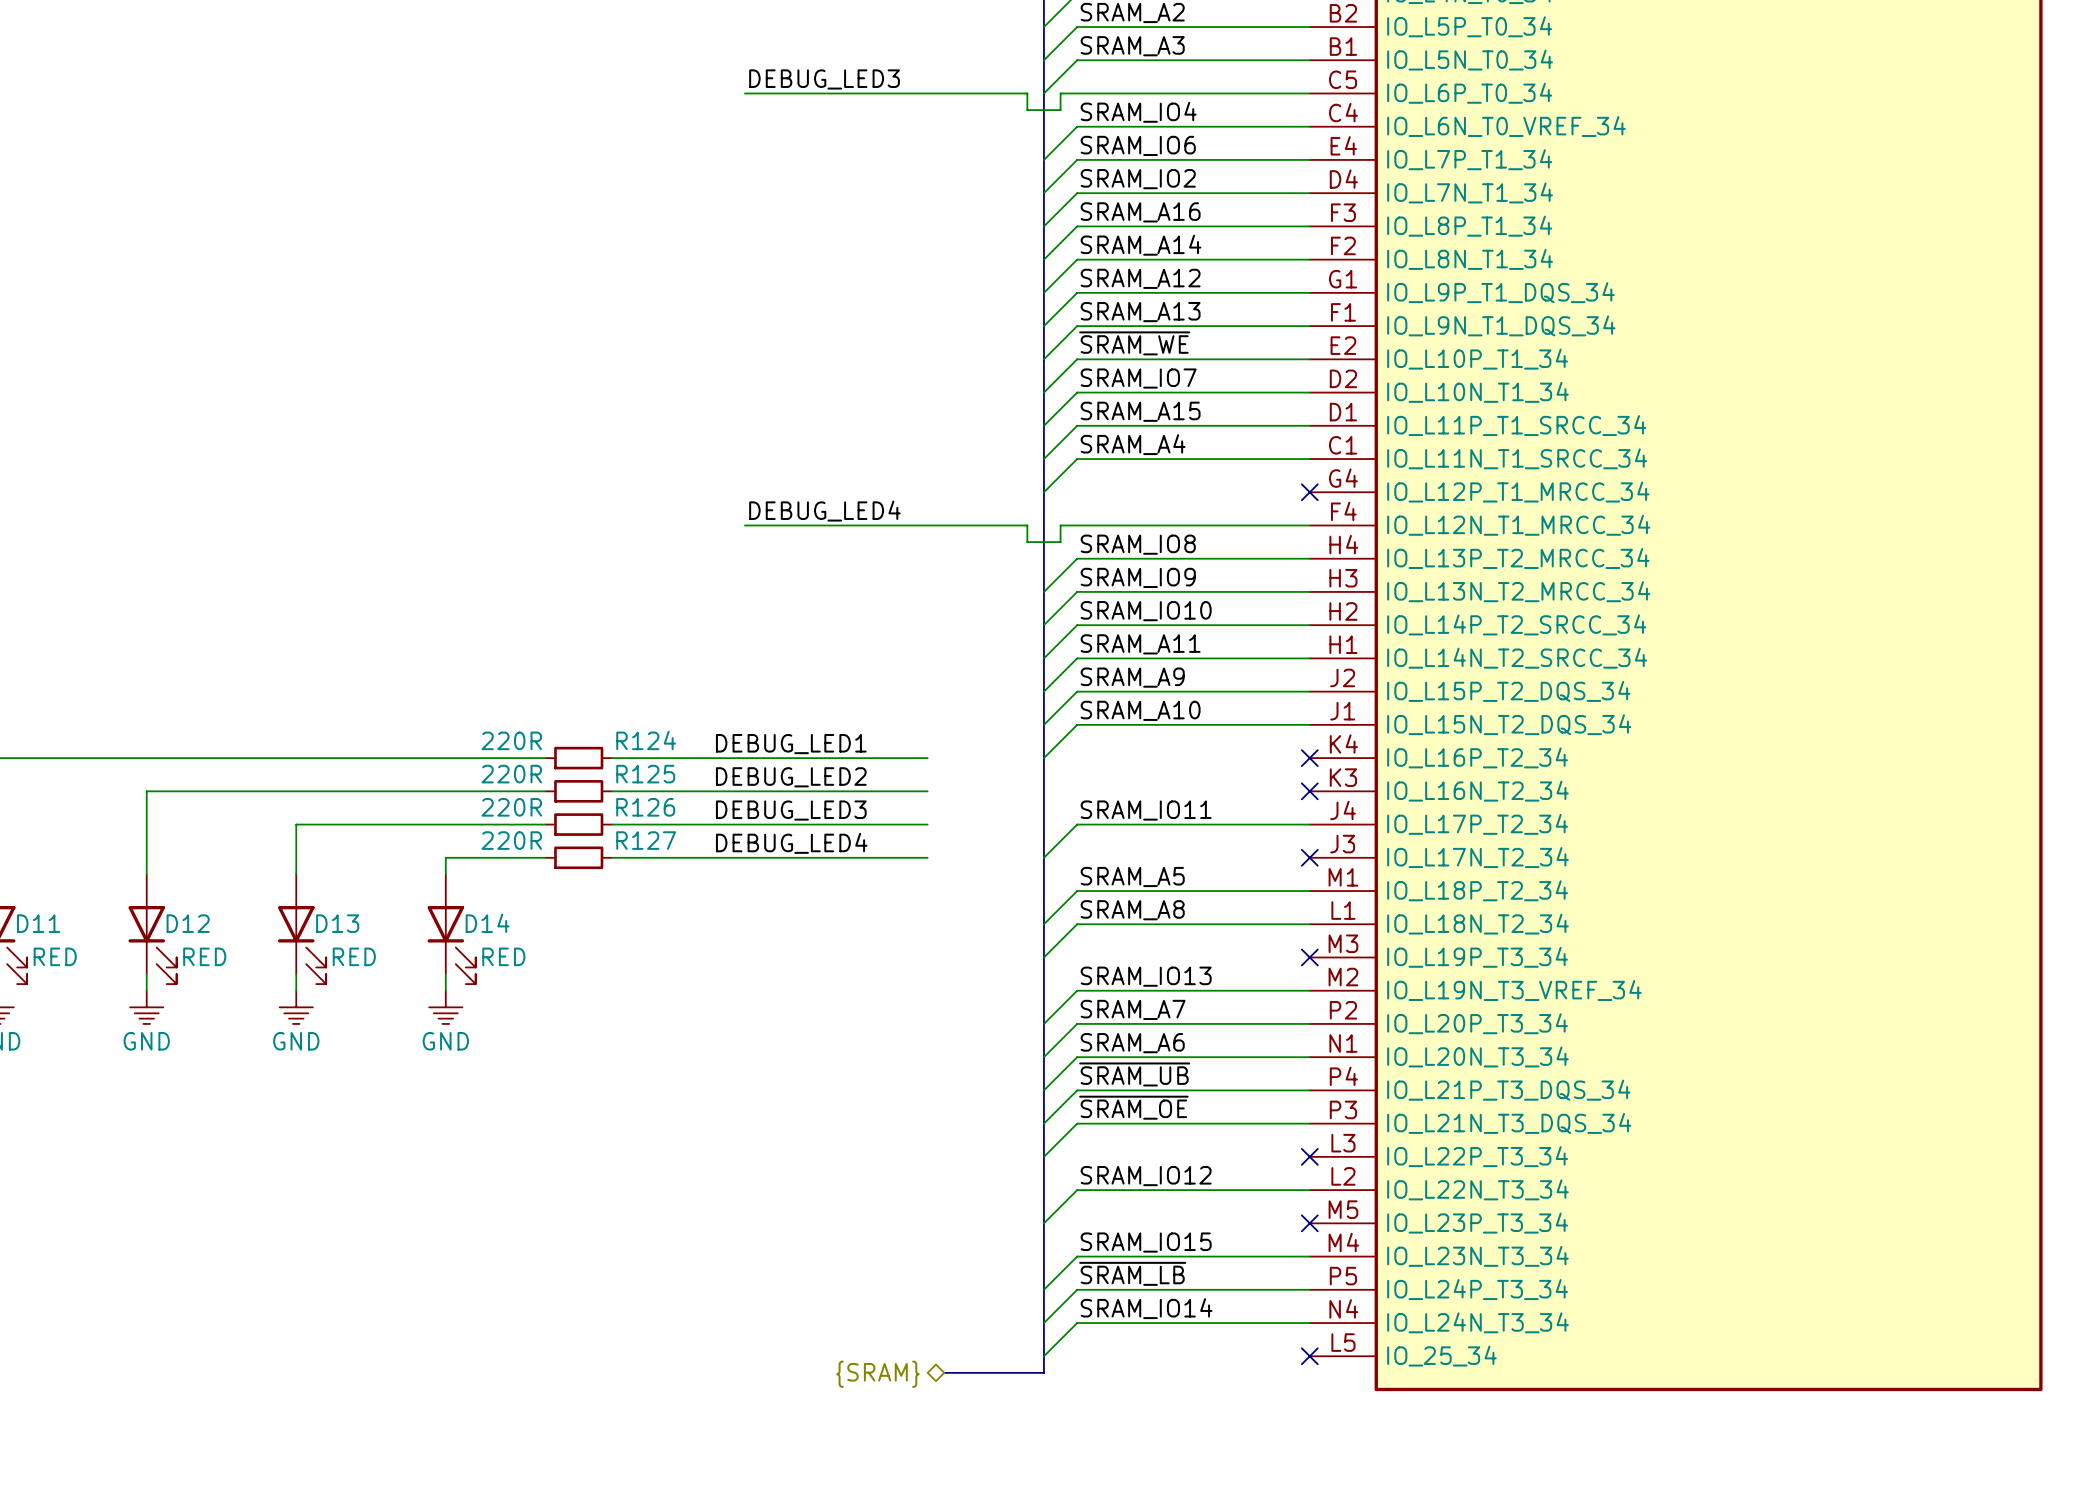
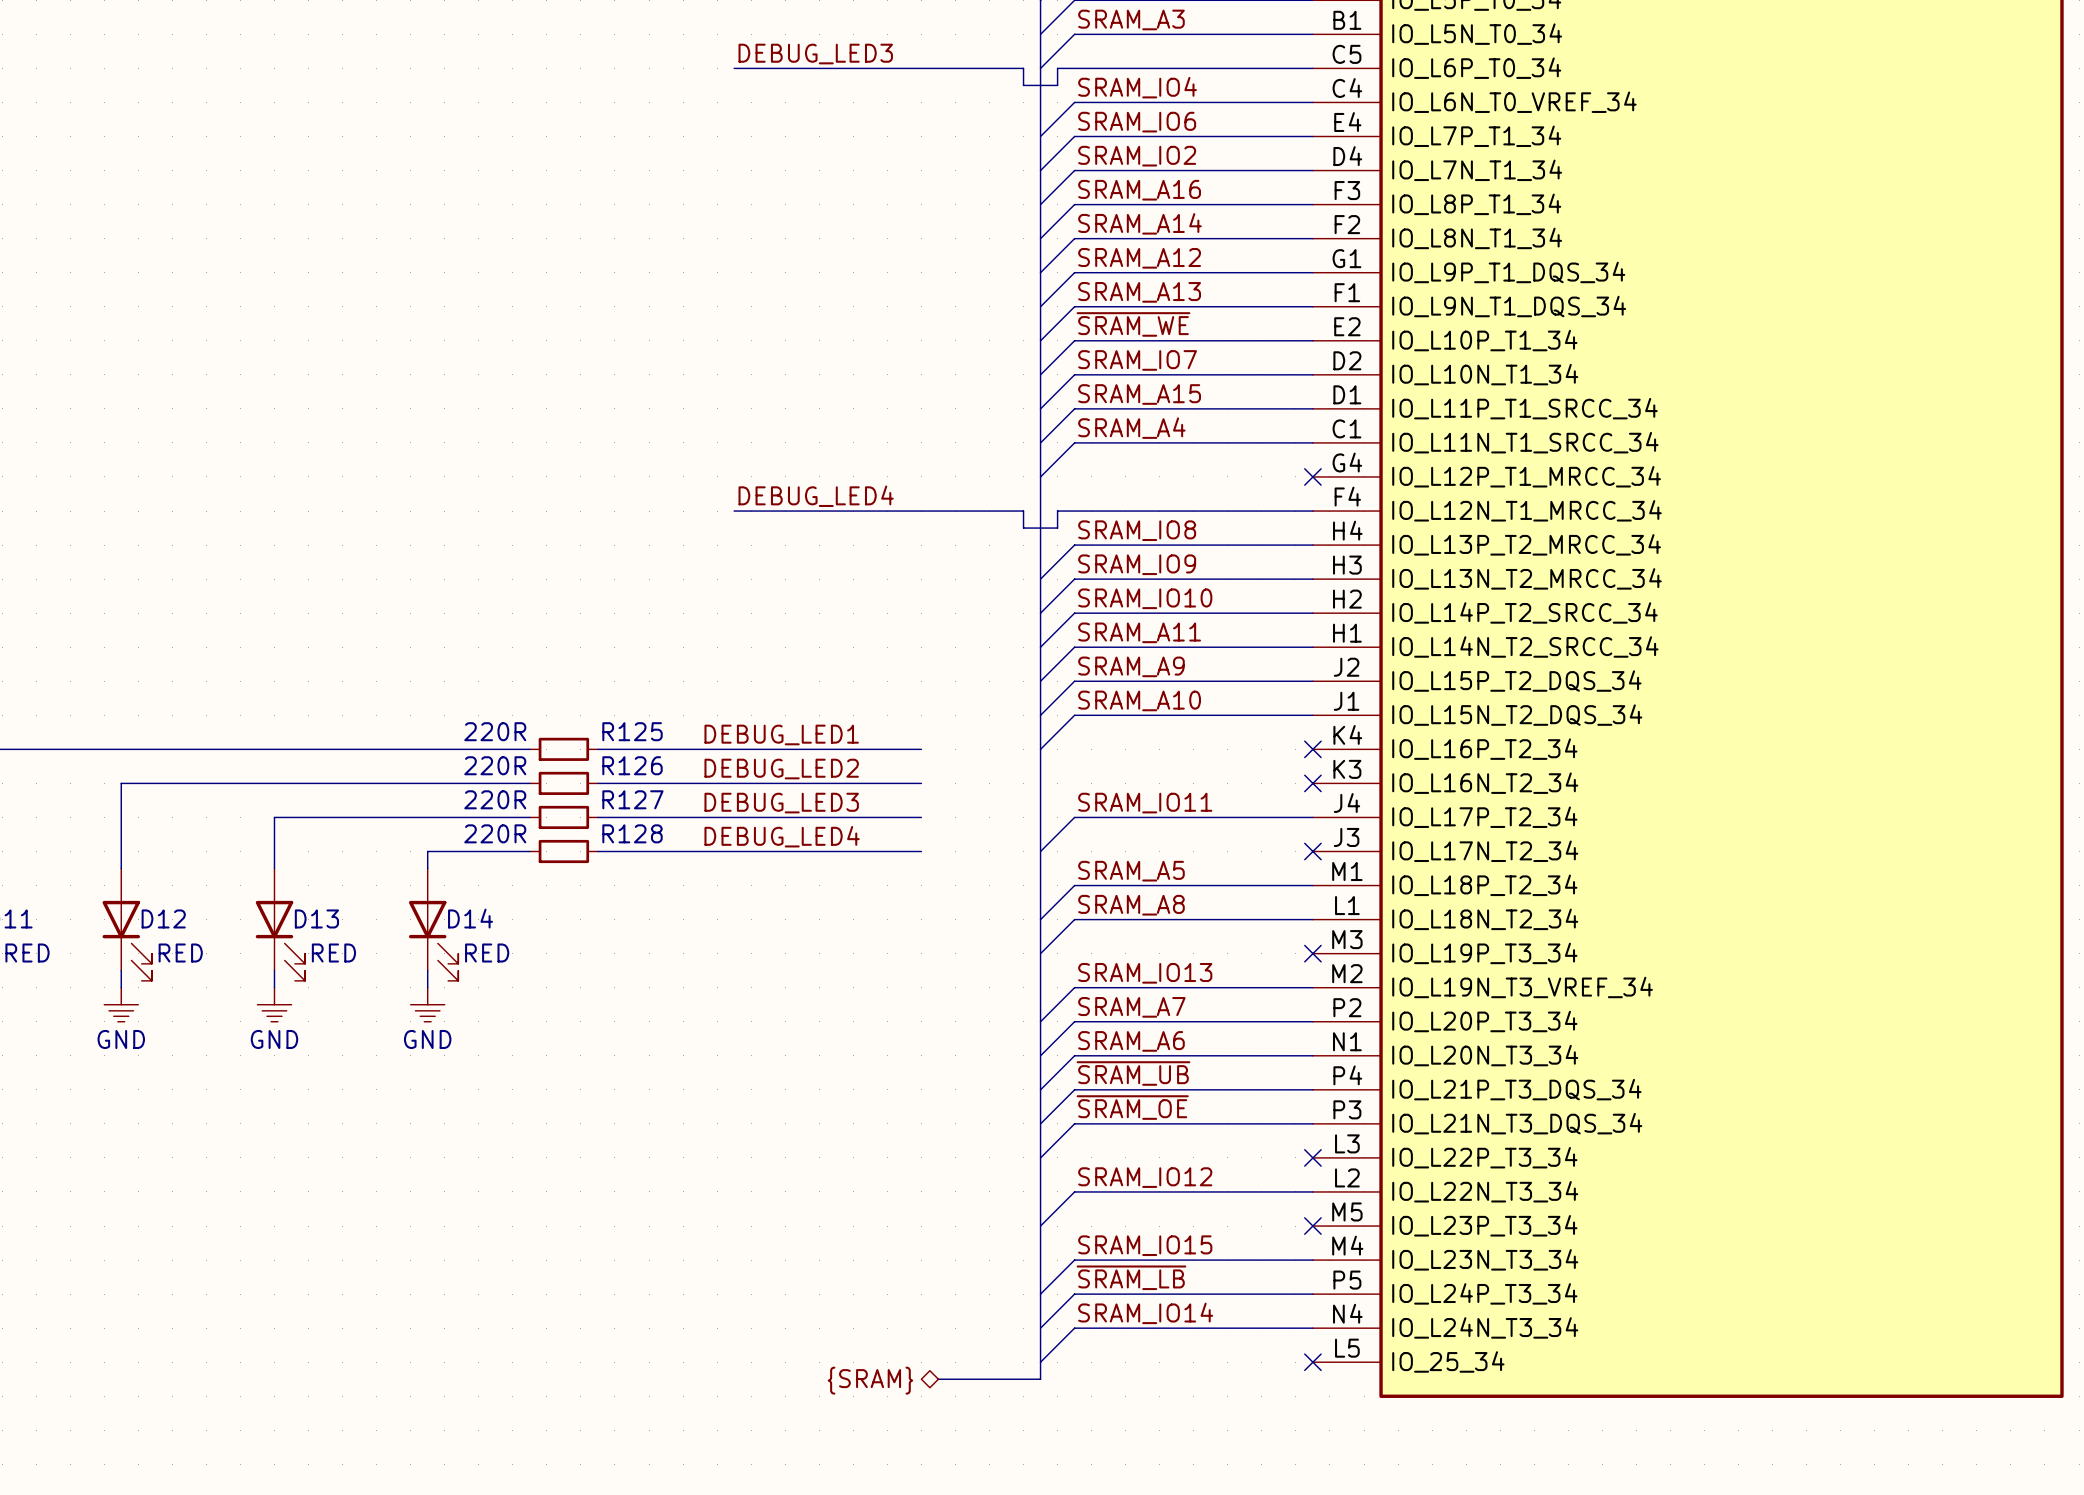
R124 name: R124 (646, 740) -> R125 (632, 731)
R125 name: R125 (645, 774) -> R126 (632, 765)
R126 name: R126 (645, 807) -> R127 (632, 799)
R127 name: R127 (646, 840) -> R128 (632, 833)

